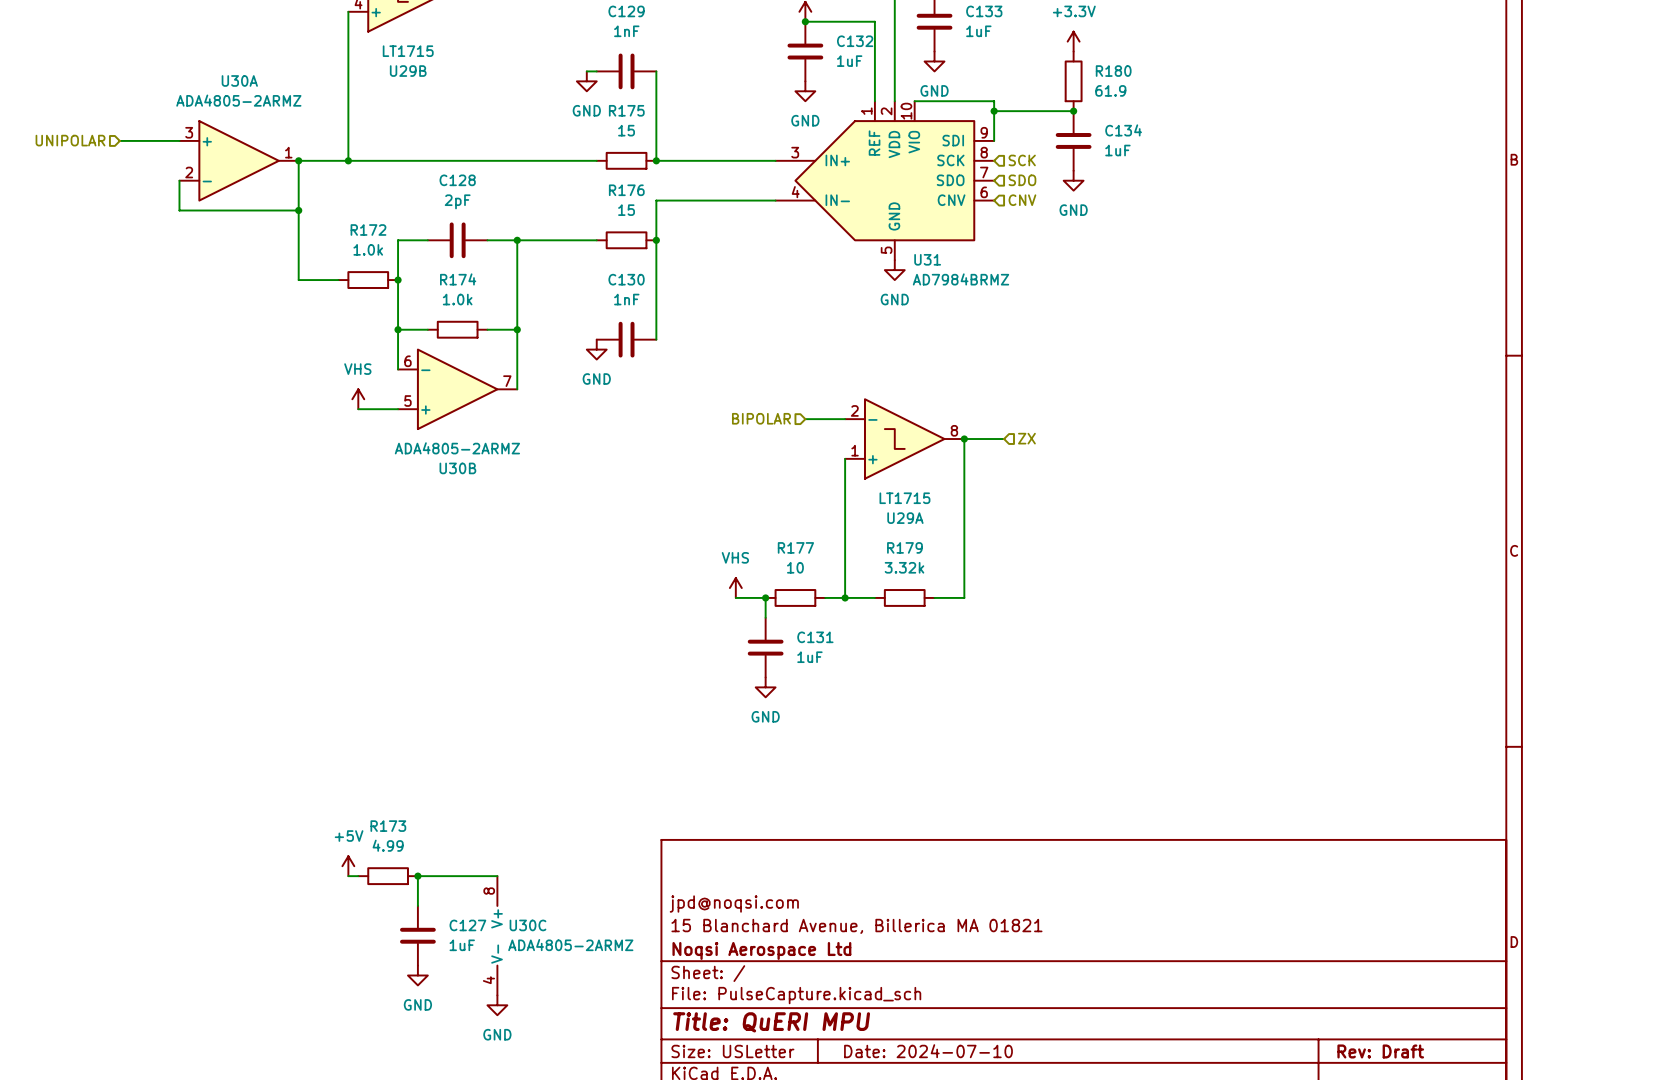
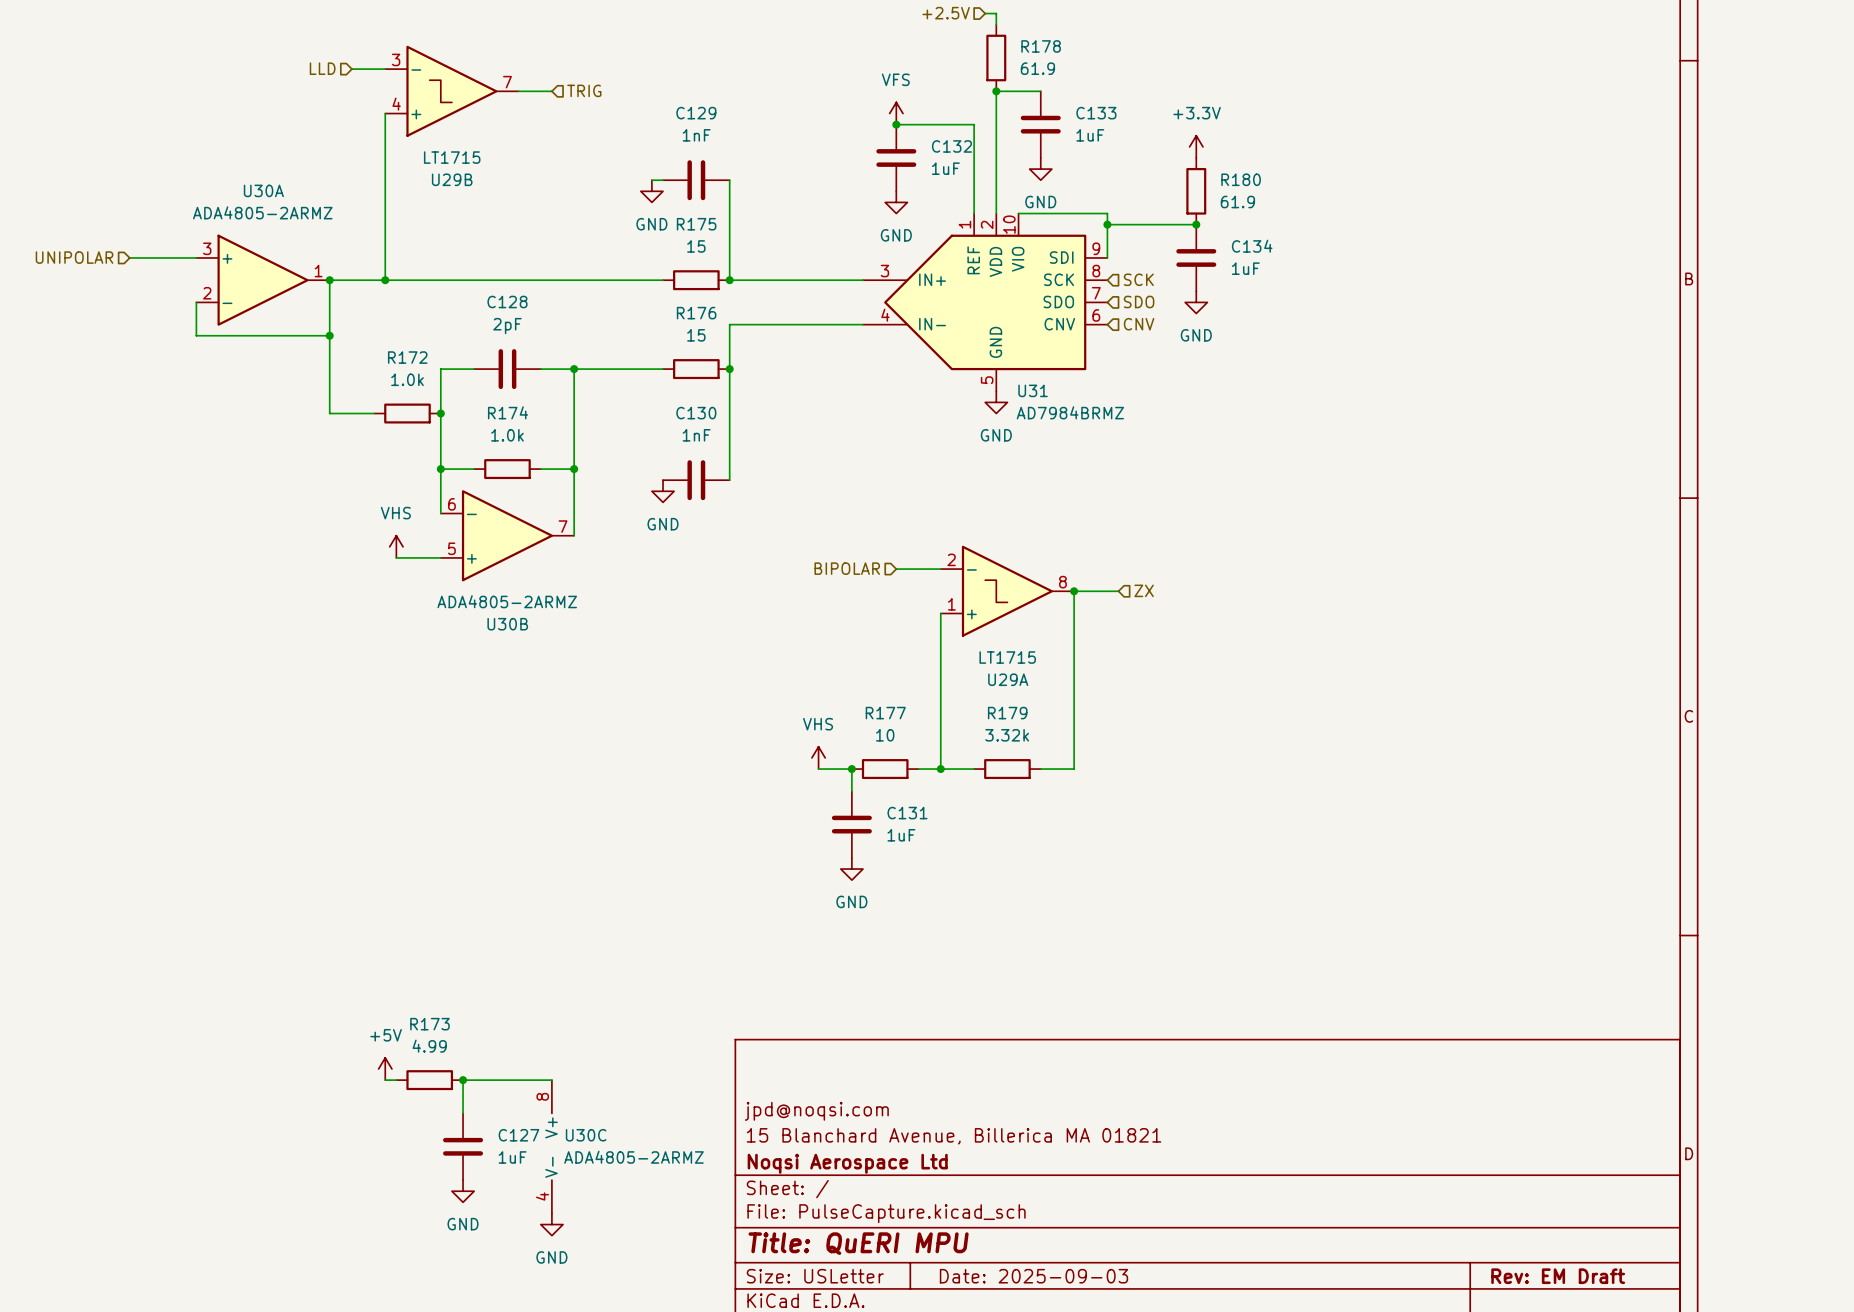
title block: Date: 2024-07-10 (928, 1051) -> Date: 2025-09-03 (1033, 1276)
title block: Rev: Draft (1380, 1051) -> Rev: EM Draft (1558, 1276)

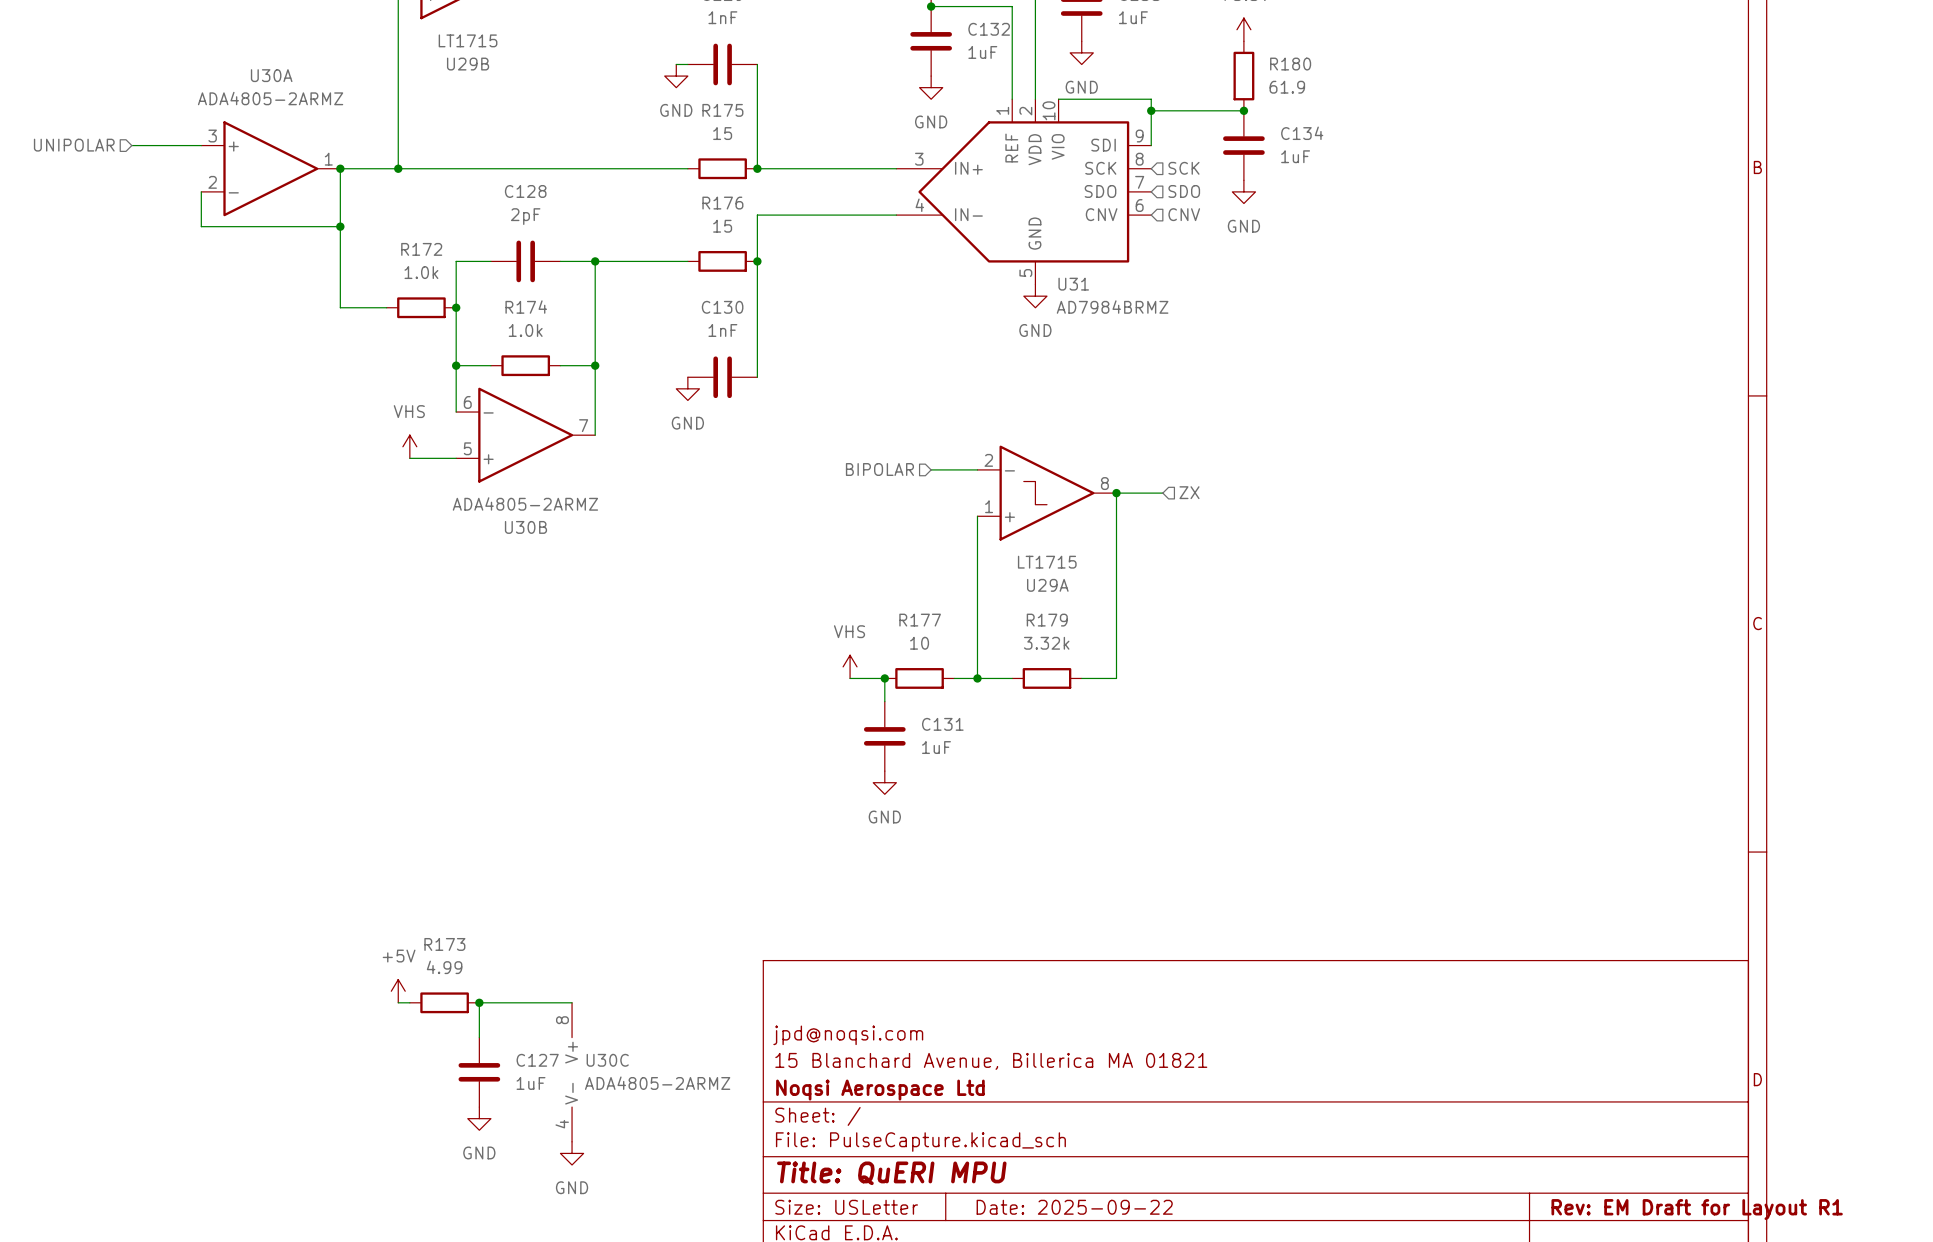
title block: Date: 2025-09-03 (1033, 1276) -> Date: 2025-09-22 (1074, 1207)
title block: Rev: EM Draft (1558, 1276) -> Rev: EM Draft for Layout R1 (1697, 1209)

